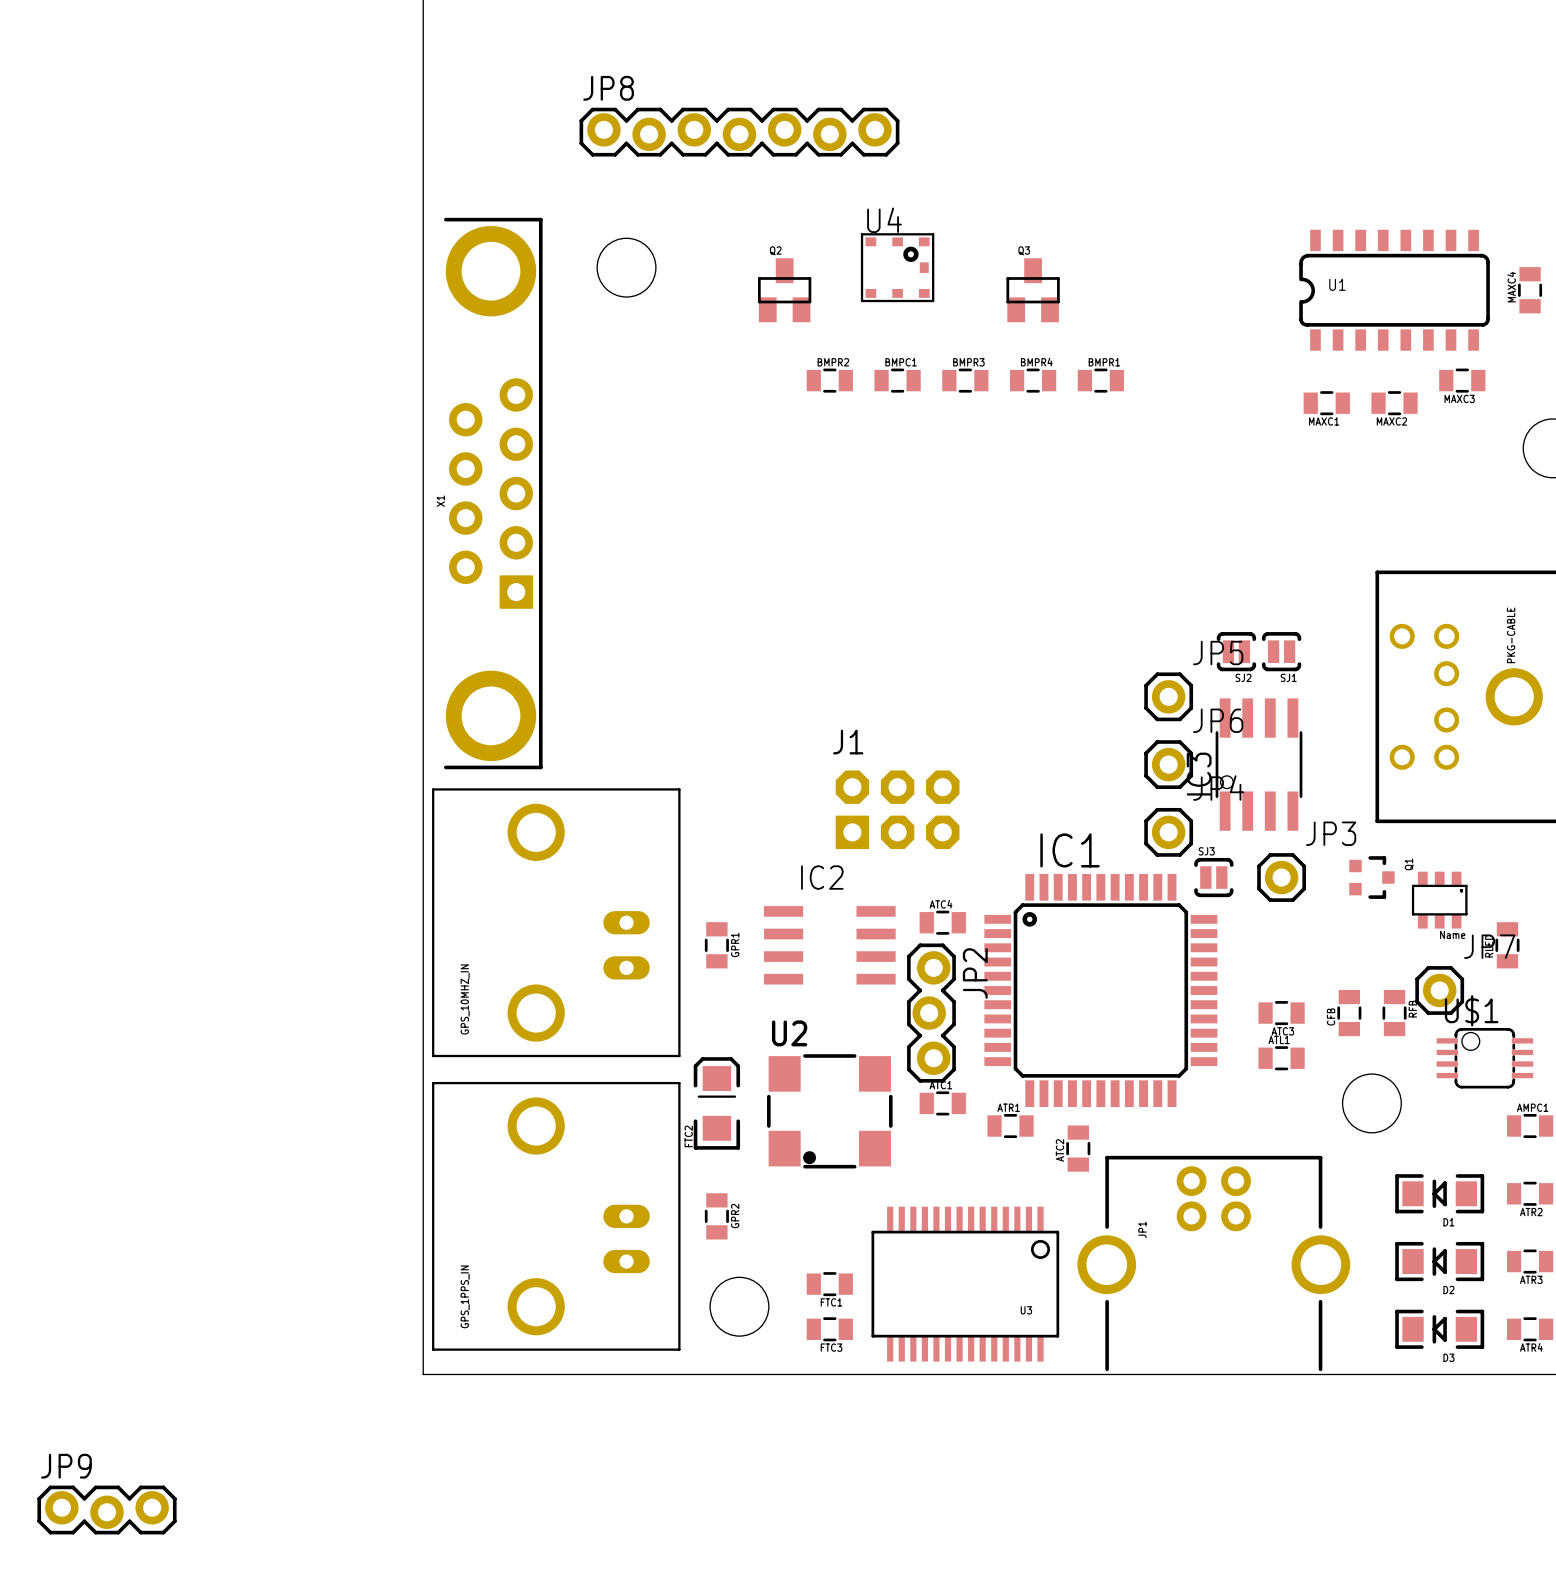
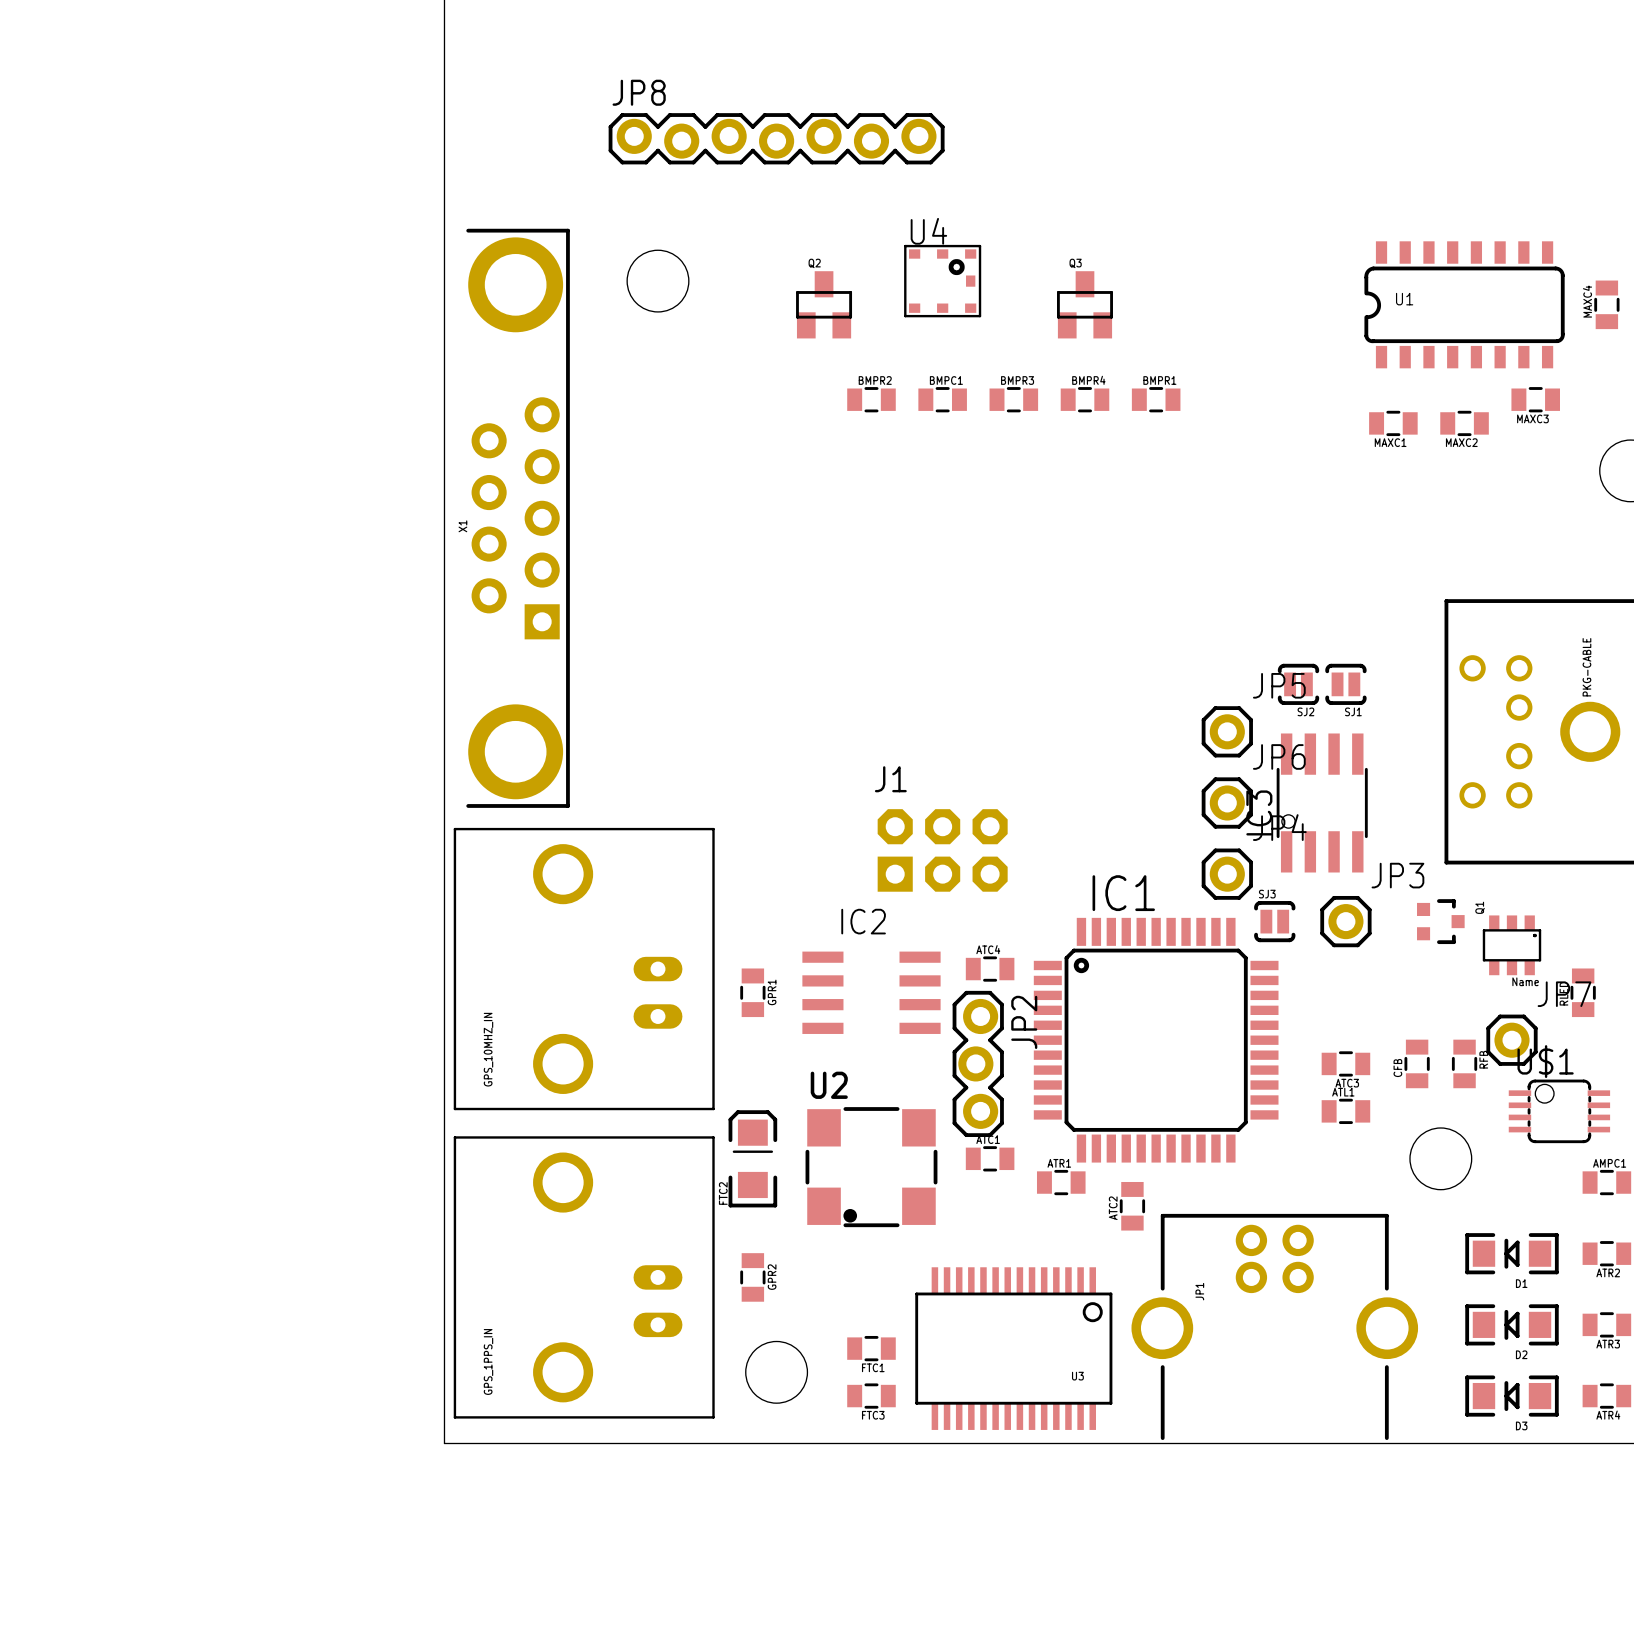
JP9: (107, 1510) -> none

